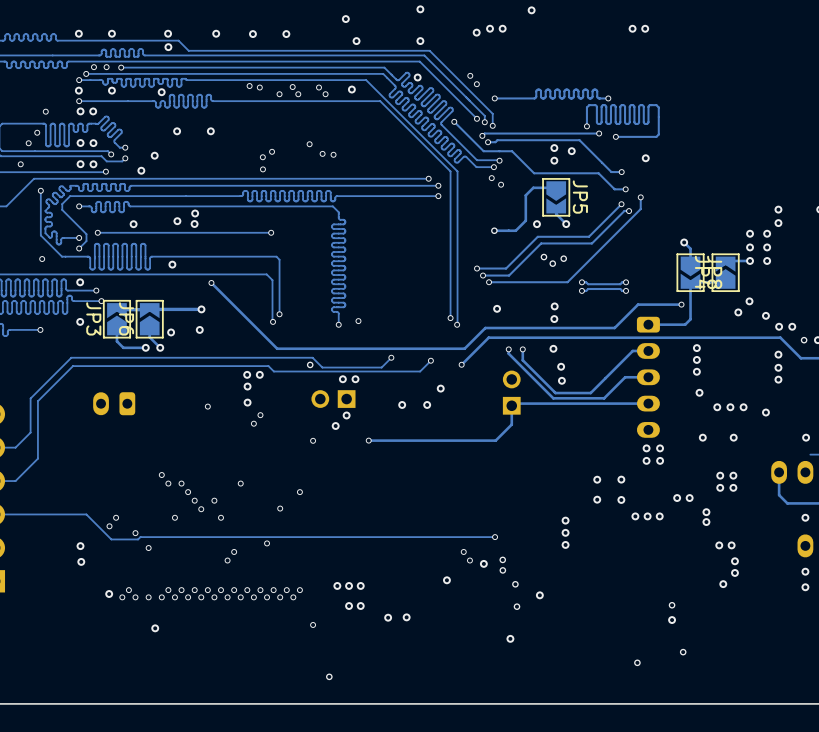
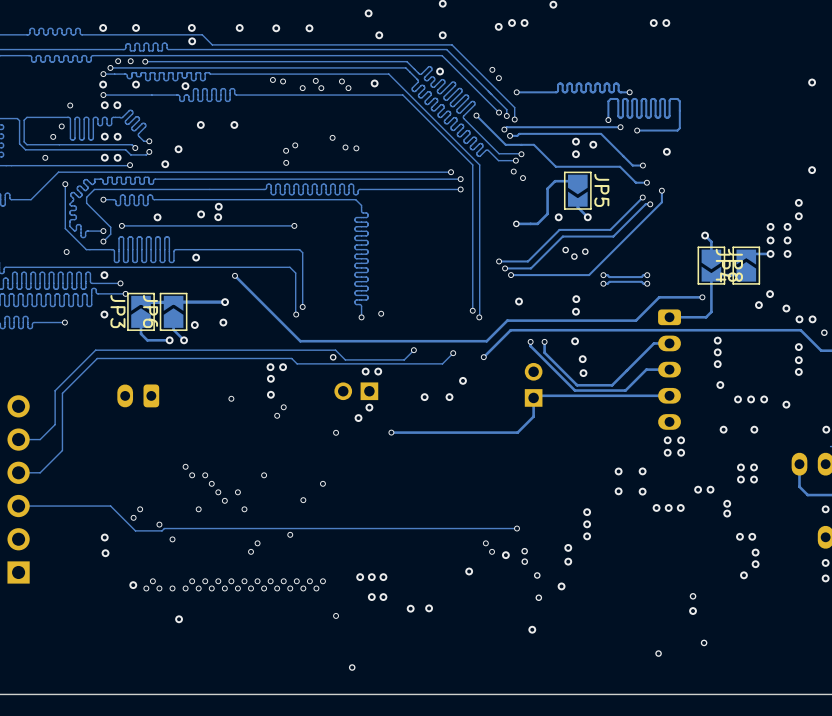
via: none -> (812, 82)
via: none -> (812, 170)
via: none -> (568, 547)
via: none -> (568, 561)

